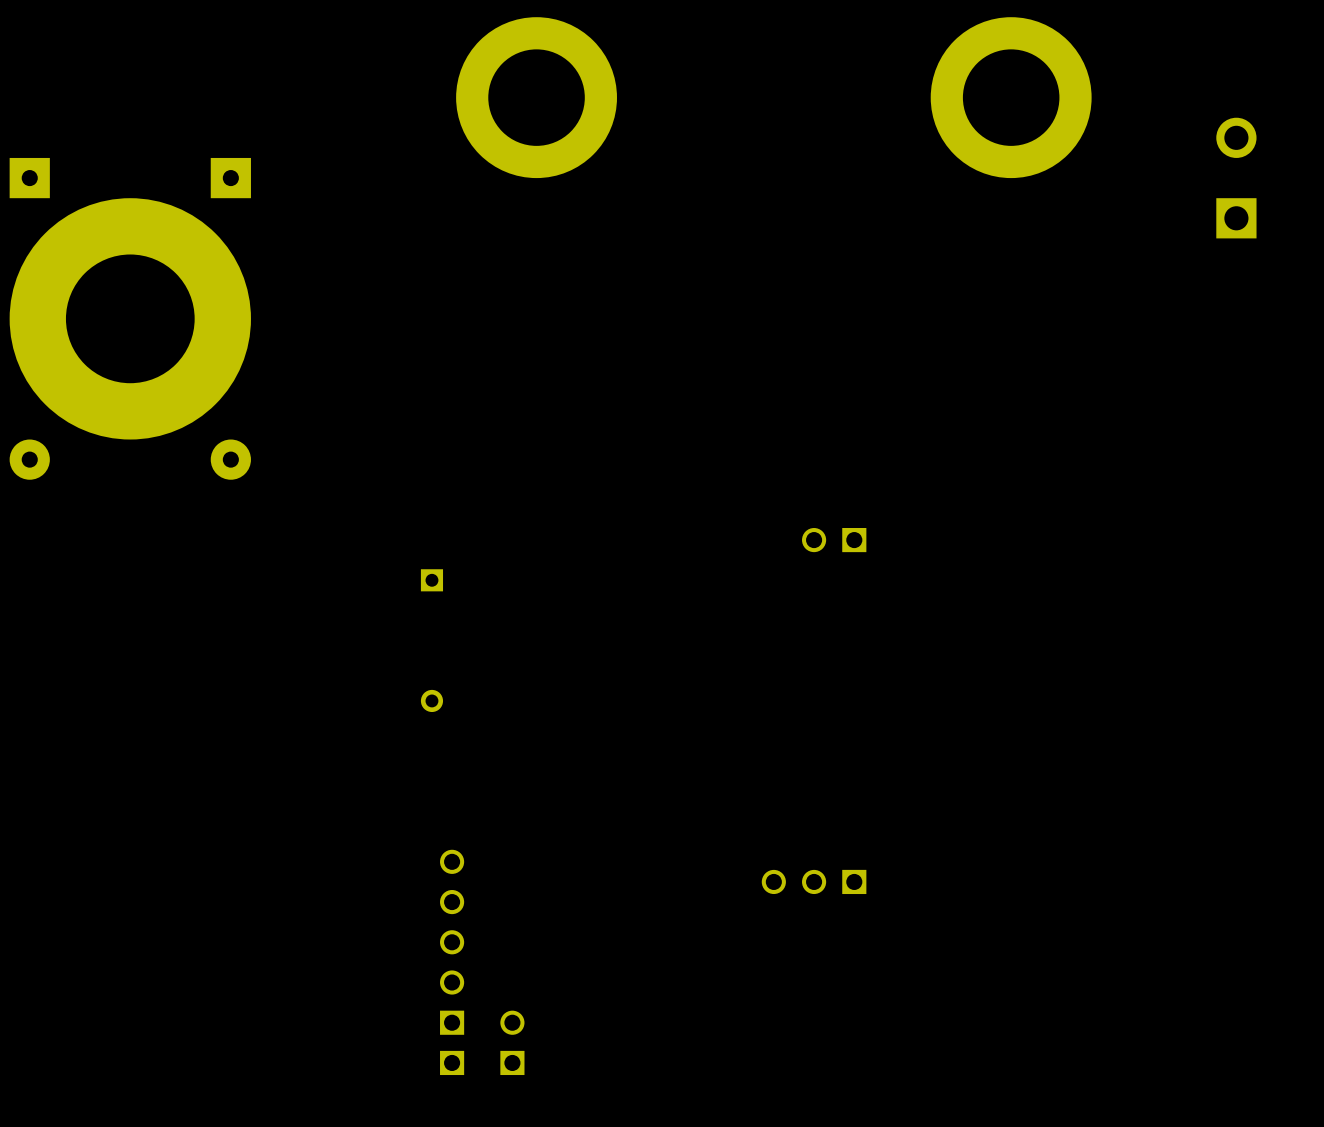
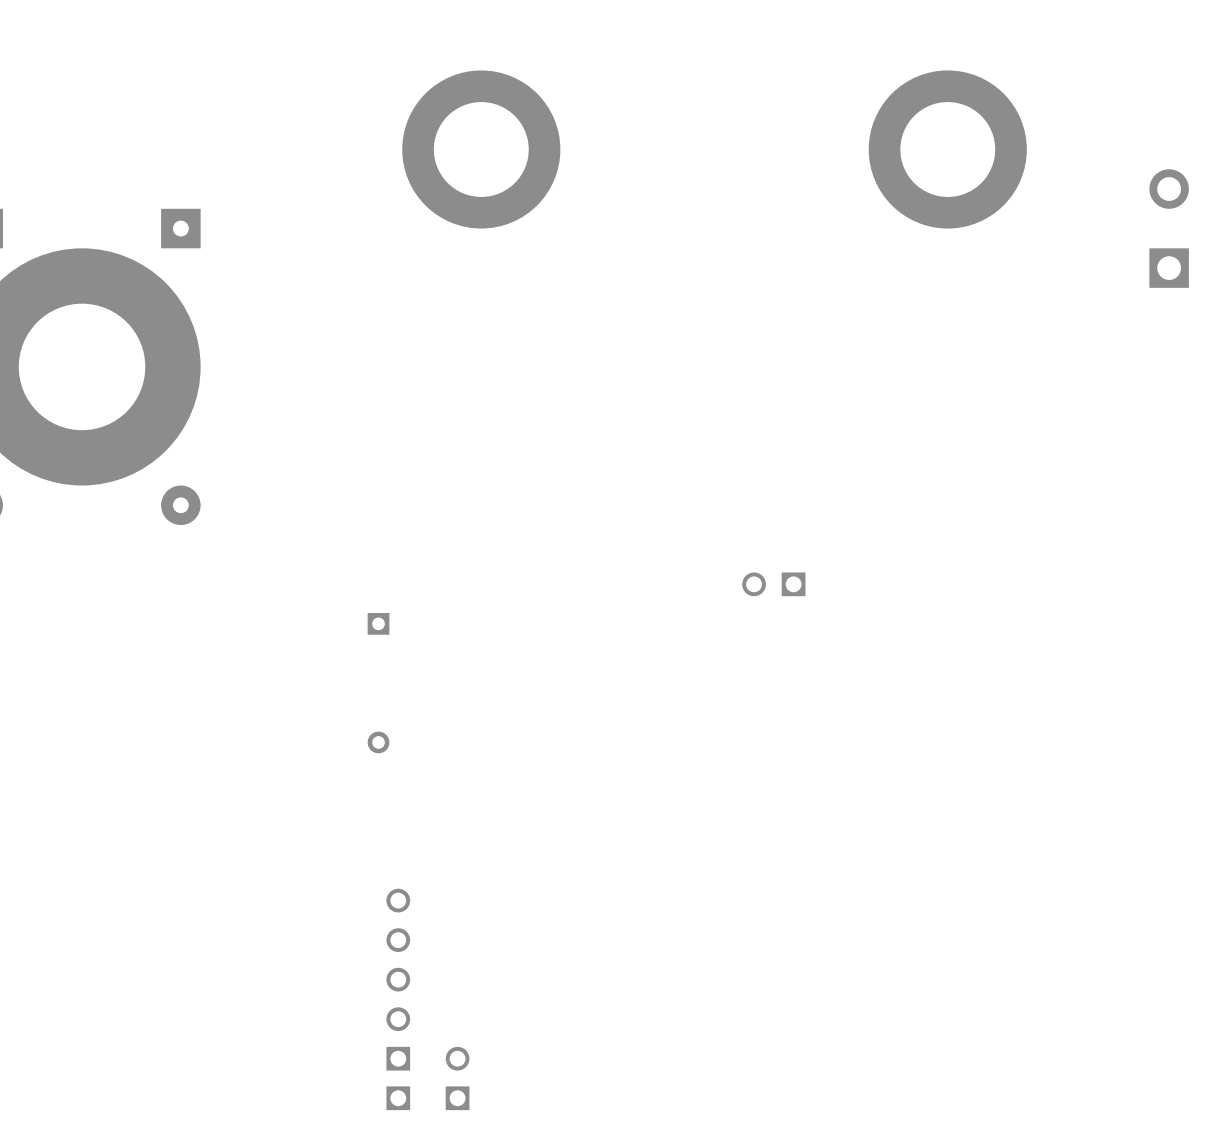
part: (814, 881) -> none

